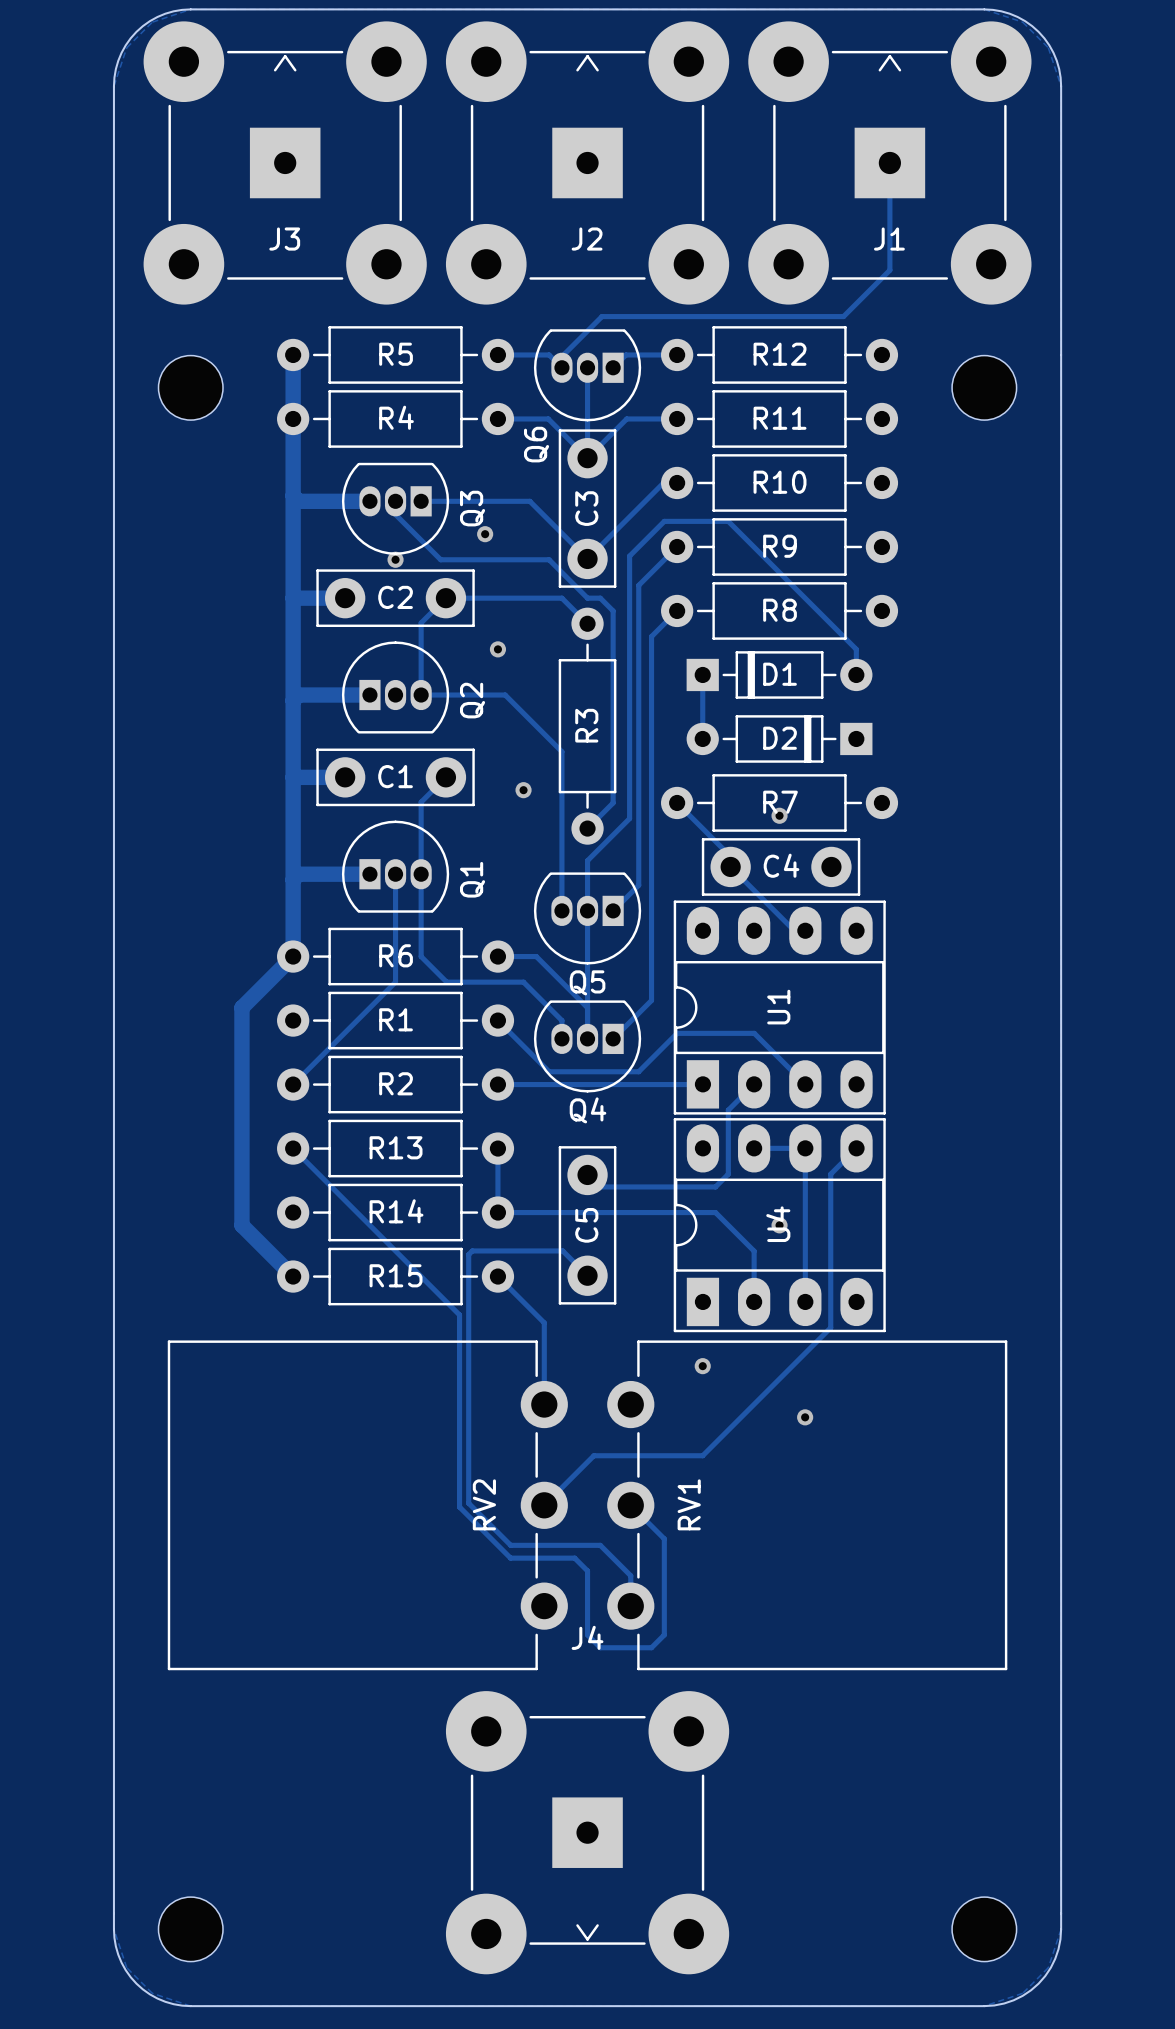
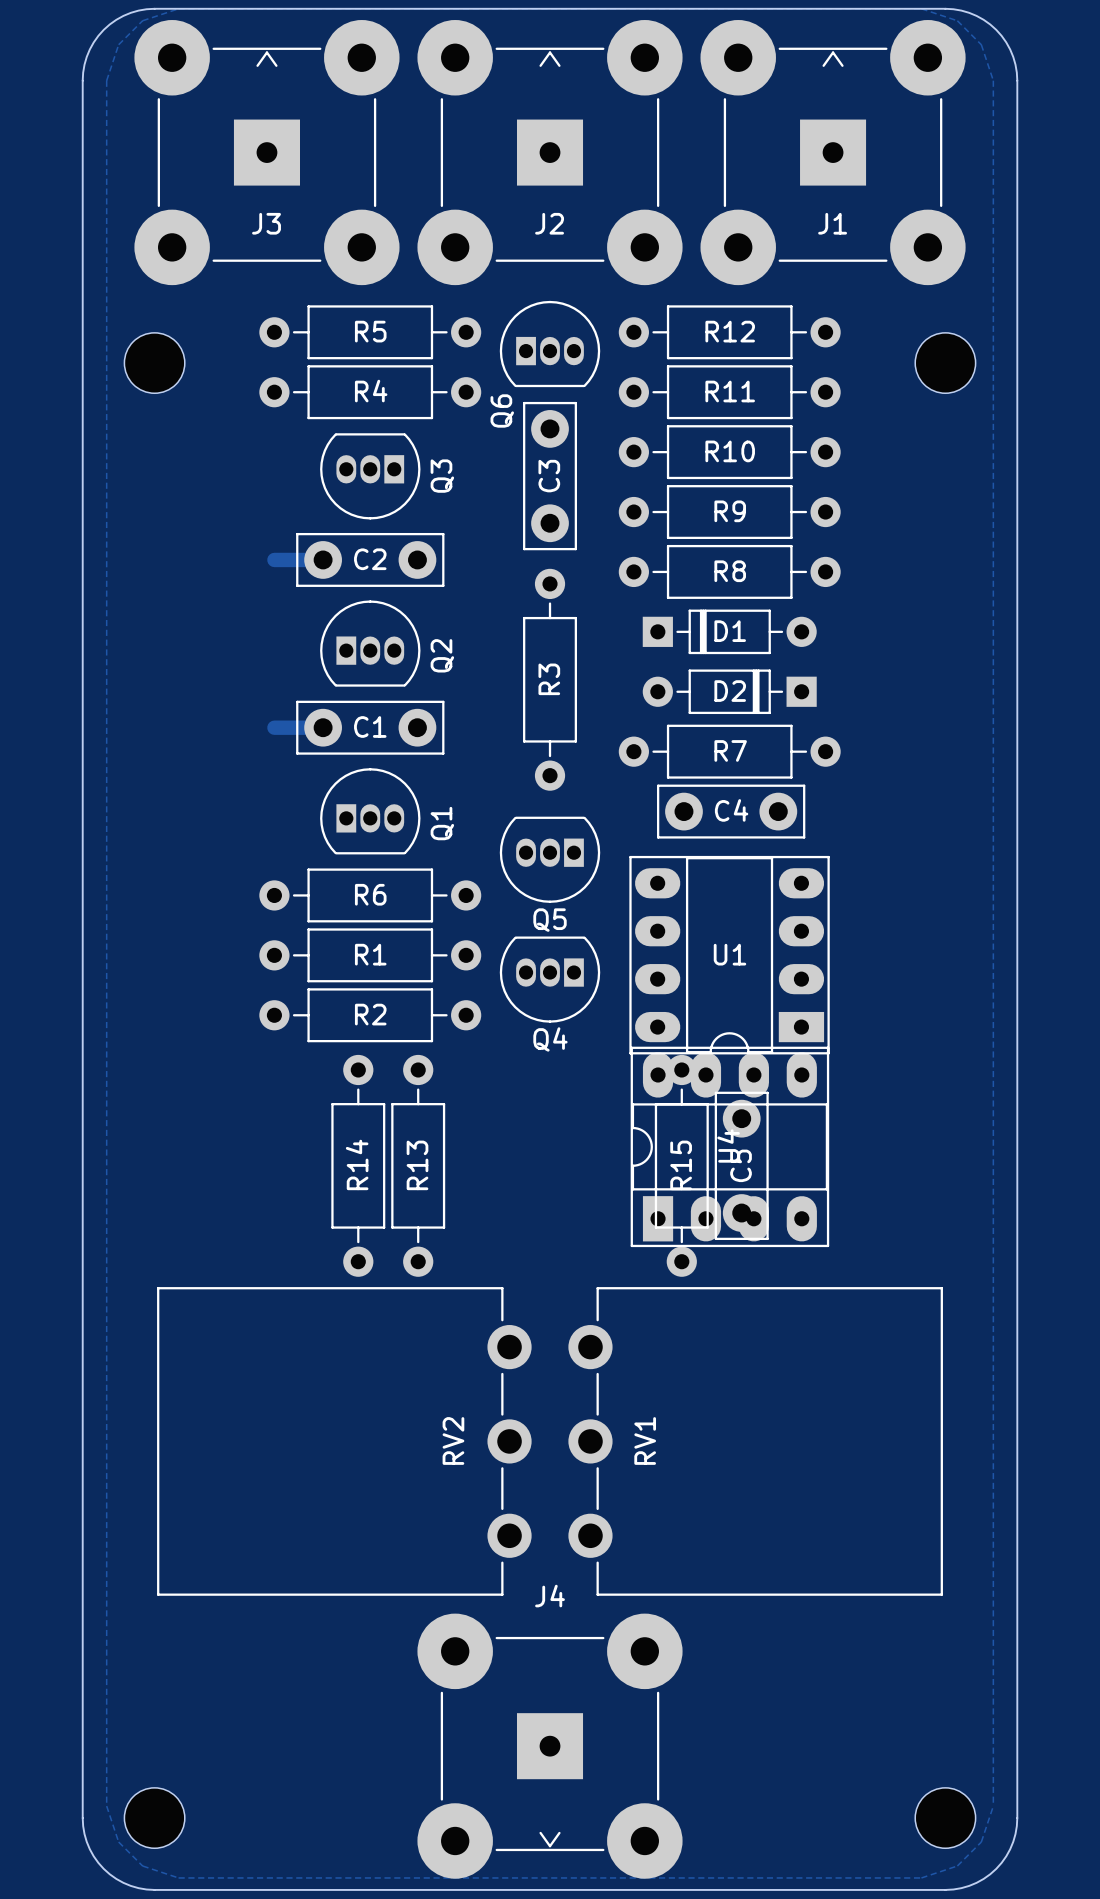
board edge: (190, 9) (165, 13) (149, 21) (136, 31) (125, 45) (118, 60) (113, 86) (113, 1929) (118, 1954) (125, 1970) (136, 1983) (149, 1994) (165, 2001) (190, 2006) (984, 2006) (1004, 2003) (1022, 1995) (1045, 1976) (1055, 1958) (1061, 1929) (1061, 86) (1059, 69) (1053, 52) (1038, 31) (1017, 16) (1001, 11) (984, 9) -> (178, 8) (138, 10) (123, 15) (109, 24) (98, 35) (89, 49) (84, 64) (82, 80) (82, 1818) (86, 1841) (93, 1856) (103, 1868) (123, 1882) (138, 1888) (154, 1889) (945, 1889) (969, 1885) (990, 1874) (1006, 1856) (1013, 1841) (1017, 1818) (1017, 80) (1015, 64) (1010, 49) (1001, 35) (990, 24) (976, 15) (961, 10) (921, 8)
track: (889, 162) (889, 270) (843, 316) (601, 316) (561, 356) (561, 367) (549, 354) (497, 354) -> none
track: (293, 354) (293, 956) (241, 1007) (241, 1225) (293, 1276) -> none
track: (677, 354) (625, 354) (613, 367) -> none
track: (587, 367) (587, 458) -> none
Q6 rotation: 0° (587, 375) -> 180° (550, 344)
part position: (190, 387) -> (154, 363)
part position: (984, 387) -> (945, 363)
track: (497, 418) (548, 418) (587, 458) -> none
track: (677, 418) (626, 418) (587, 458) -> none
track: (677, 482) (663, 482) (587, 558) (529, 501) (421, 501) -> none
track: (293, 495) (298, 501) (369, 501) -> none
track: (395, 501) (395, 514) (440, 559) (549, 559) (587, 598) (600, 598) (613, 610) (613, 802) (587, 828) -> none
via: (485, 534) -> none
track: (677, 546) (638, 585) (638, 885) (613, 910) -> none
via: (395, 559) -> none
track: (677, 610) (651, 636) (651, 1000) (613, 1038) -> none
track: (587, 623) (561, 598) (445, 598) (421, 622) (421, 695) (505, 695) (561, 751) (561, 910) -> none
via: (497, 649) -> none
track: (702, 674) (702, 738) -> none
track: (856, 674) (856, 649) (728, 521) (664, 521) (629, 556) (629, 818) (587, 860) (587, 1038) -> none
track: (369, 695) (298, 695) (293, 700) -> none
track: (445, 777) (421, 802) (421, 956) (446, 982) (523, 982) (561, 1020) (561, 1038) -> none
via: (523, 790) -> none
track: (677, 802) (730, 856) (730, 866) (794, 930) (805, 930) -> none
via: (779, 815) -> none
track: (369, 874) (298, 874) (293, 879) -> none
track: (395, 874) (395, 982) (293, 1084) -> none
track: (497, 956) (536, 956) (587, 1007) -> none
U1 rotation: 0° (779, 1007) -> 90° counterclockwise (729, 955)
track: (497, 1020) (549, 1071) (638, 1071) (677, 1033) (754, 1033) (805, 1084) -> none
track: (497, 1084) (702, 1084) -> none
track: (754, 1084) (728, 1110) (728, 1174) (715, 1186) (599, 1186) (587, 1174) -> none
track: (293, 1148) (459, 1314) (459, 1507) (510, 1558) (574, 1558) (587, 1570) (587, 1634) (600, 1647) (651, 1647) (664, 1634) (664, 1538) (630, 1505) -> none
R13 rotation: 0° (395, 1148) -> 90° clockwise (418, 1165)
track: (497, 1148) (497, 1212) (715, 1212) (754, 1251) (754, 1301) -> none
track: (754, 1148) (805, 1148) (805, 1301) -> none
track: (856, 1148) (830, 1174) (830, 1327) (702, 1455) (593, 1455) (544, 1505) -> none
R14 rotation: 0° (395, 1212) -> 90° clockwise (358, 1165)
C5 position: (587, 1225) -> (741, 1165)
via: (779, 1225) -> none
track: (587, 1275) (562, 1250) (472, 1250) (468, 1254) (468, 1503) (510, 1545) (600, 1545) (630, 1575) (630, 1606) -> none
R15 rotation: 0° (395, 1276) -> 90° clockwise (681, 1165)
R15 position: (395, 1276) -> (681, 1165)
track: (497, 1276) (544, 1322) (544, 1404) -> none
via: (702, 1366) -> none
via: (805, 1417) -> none
RV2 position: (367, 1505) -> (344, 1441)
RV1 position: (807, 1505) -> (755, 1441)
J4 name position: J4 (587, 1637) -> J4 (550, 1596)
J4 position: (587, 1832) -> (550, 1746)
part position: (190, 1929) -> (154, 1818)
part position: (984, 1929) -> (945, 1818)

